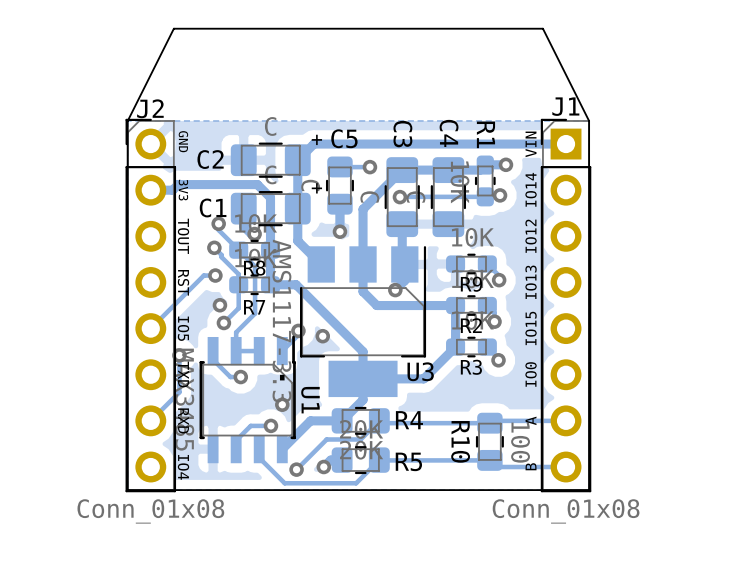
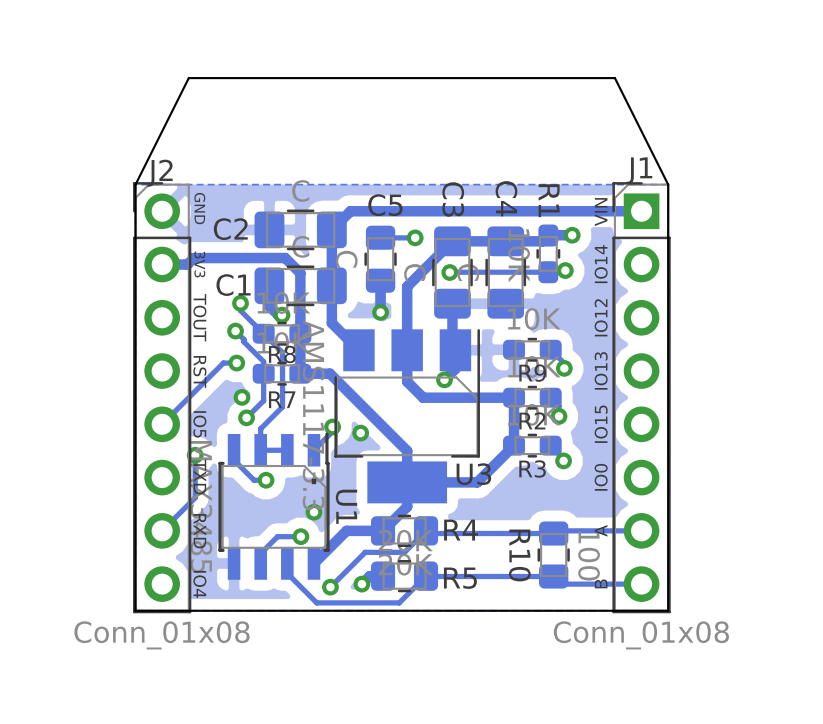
text: + (316, 139) -> none
text: + (316, 188) -> none

